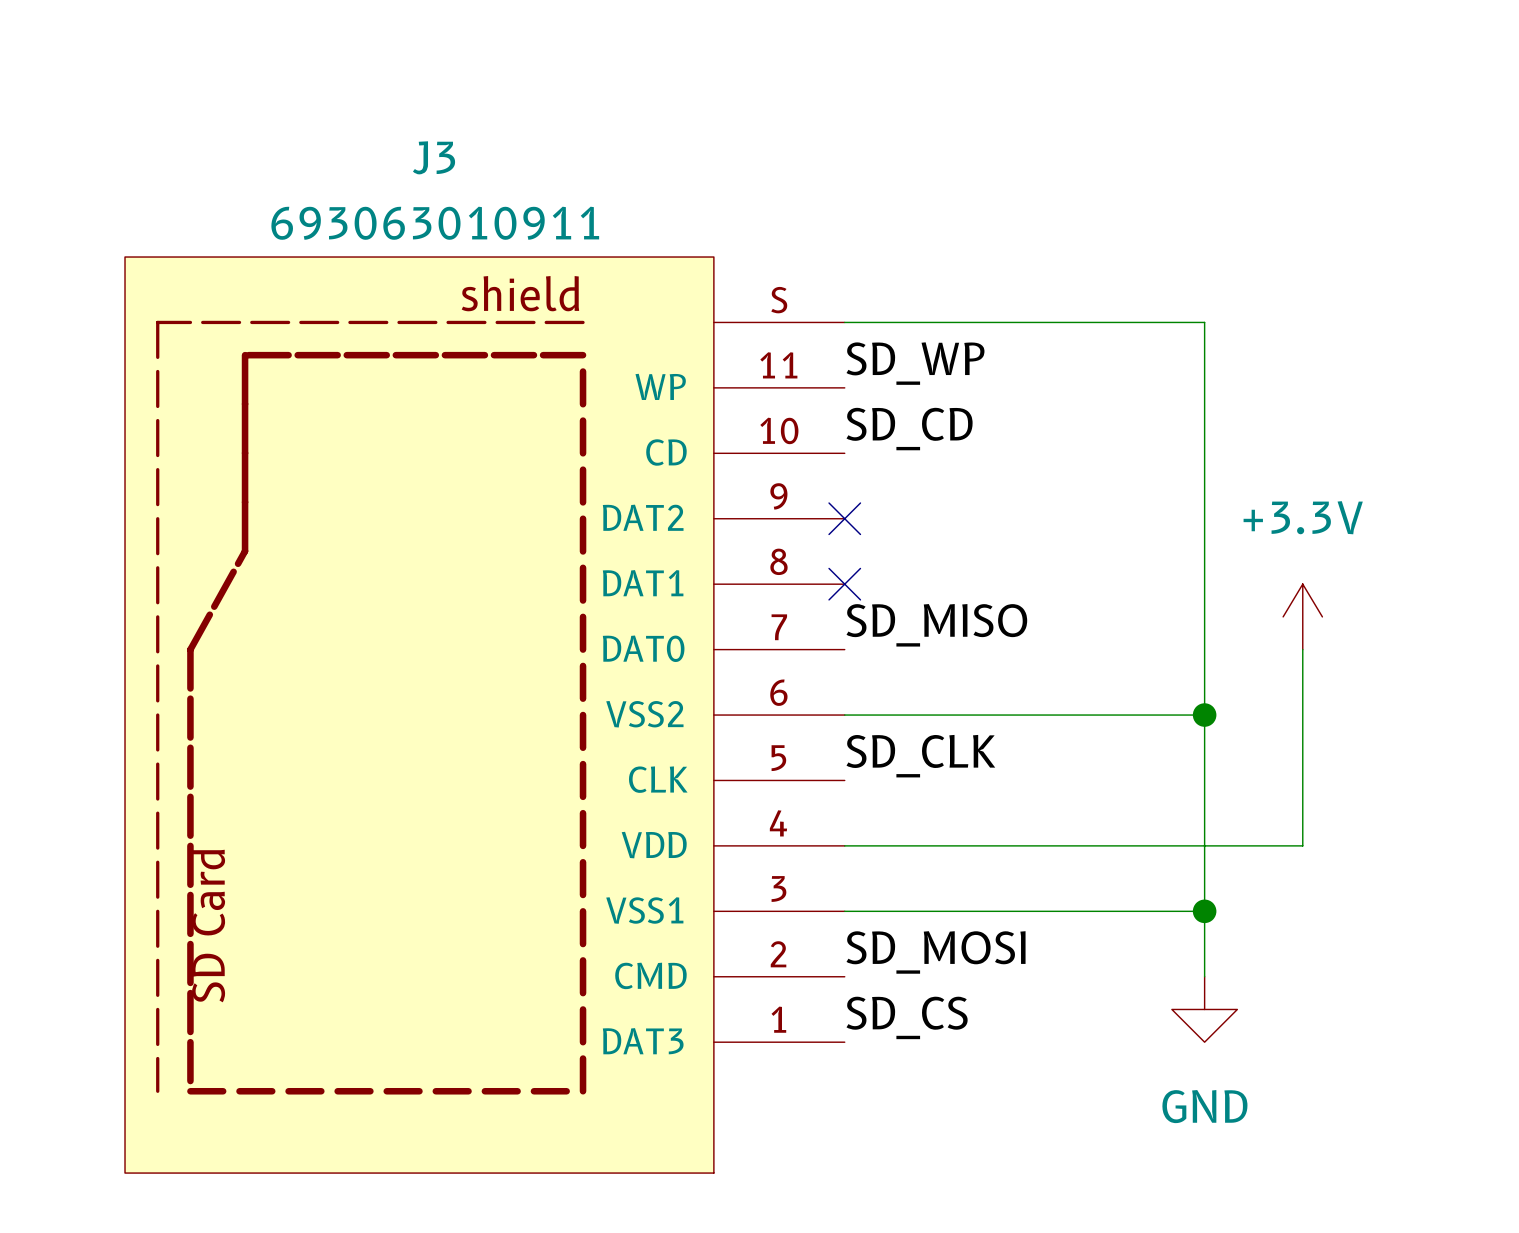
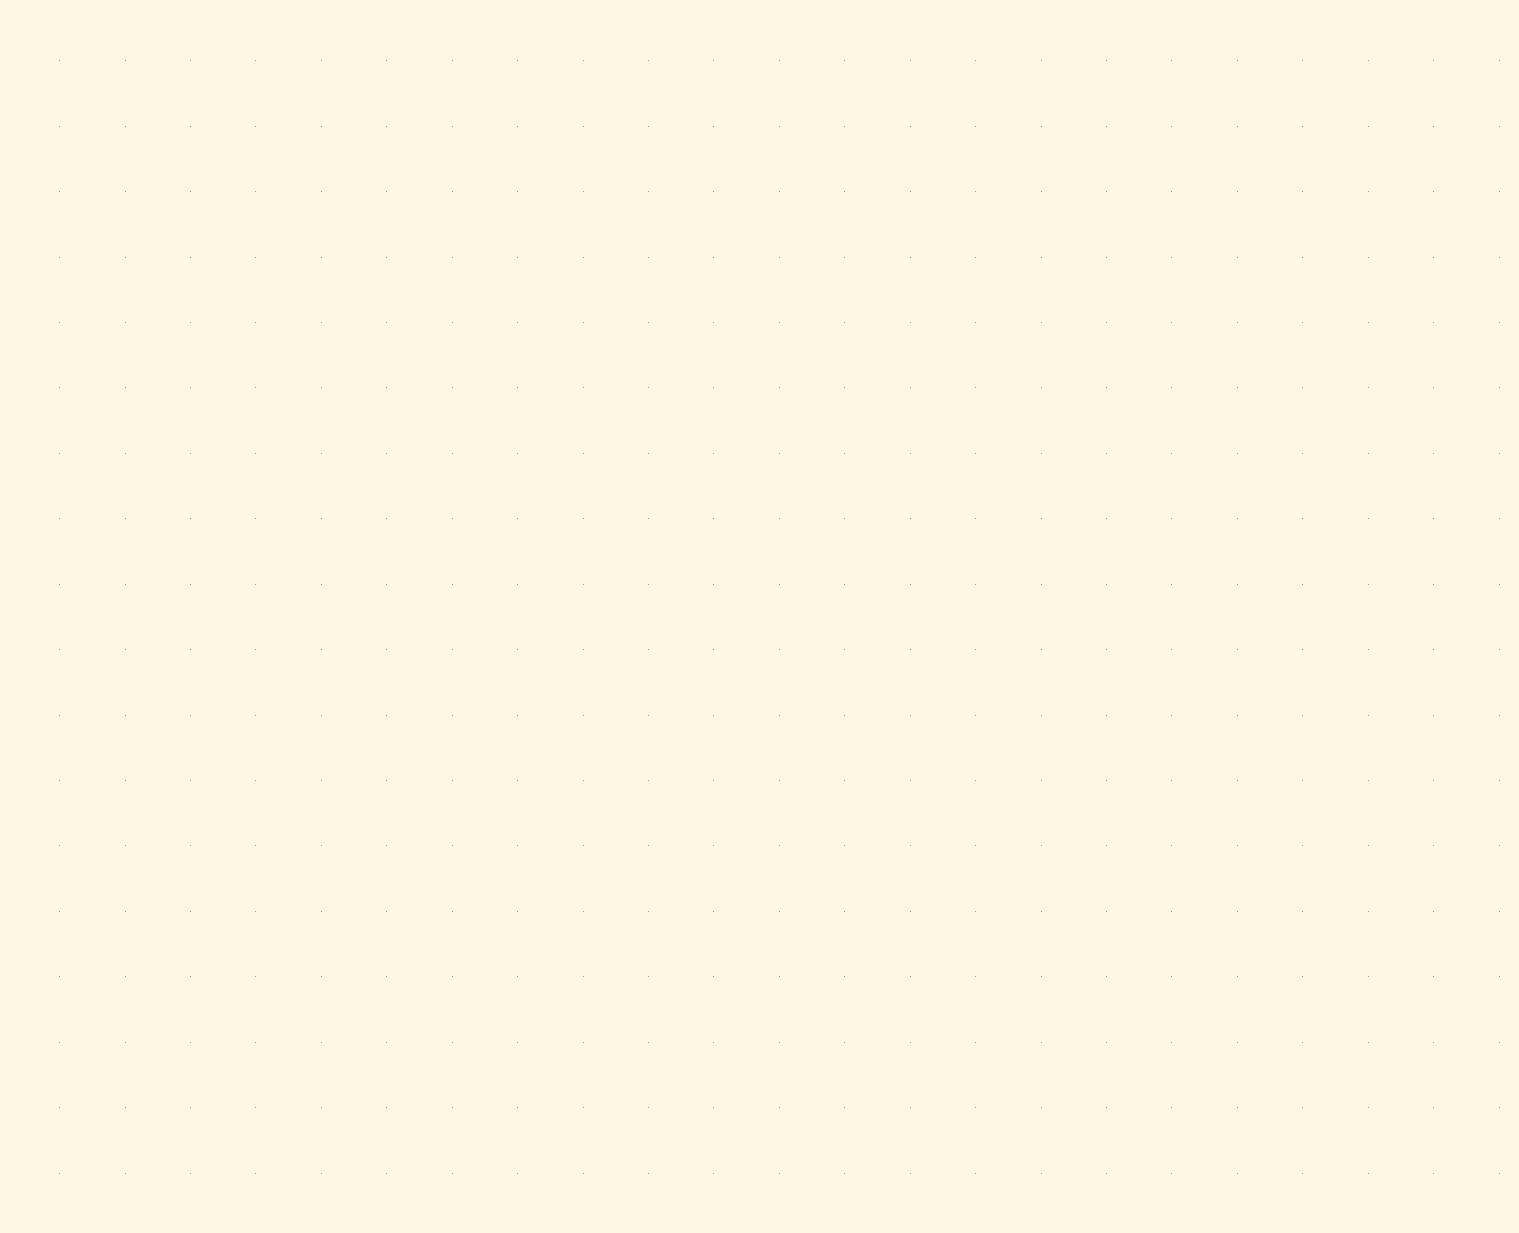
wire: (844, 322) (1204, 322) (1204, 976) -> none
label: SD_WP (915, 363) -> none
label: SD_CD (909, 429) -> none
no-connect mark: (844, 518) -> none
no-connect mark: (844, 584) -> none
power symbol: +3.3V (1302, 616) -> none
label: SD_MISO (936, 625) -> none
wire: (1302, 649) (1302, 845) (844, 845) -> none
J3: 693063010911 (484, 715) -> none
wire: (844, 715) (1204, 715) -> none
junction: (1204, 715) -> none
label: SD_CLK (920, 756) -> none
wire: (844, 911) (1204, 911) -> none
junction: (1204, 911) -> none
label: SD_MOSI (936, 952) -> none
power symbol: GND (1204, 1009) -> none
label: SD_CS (907, 1017) -> none

